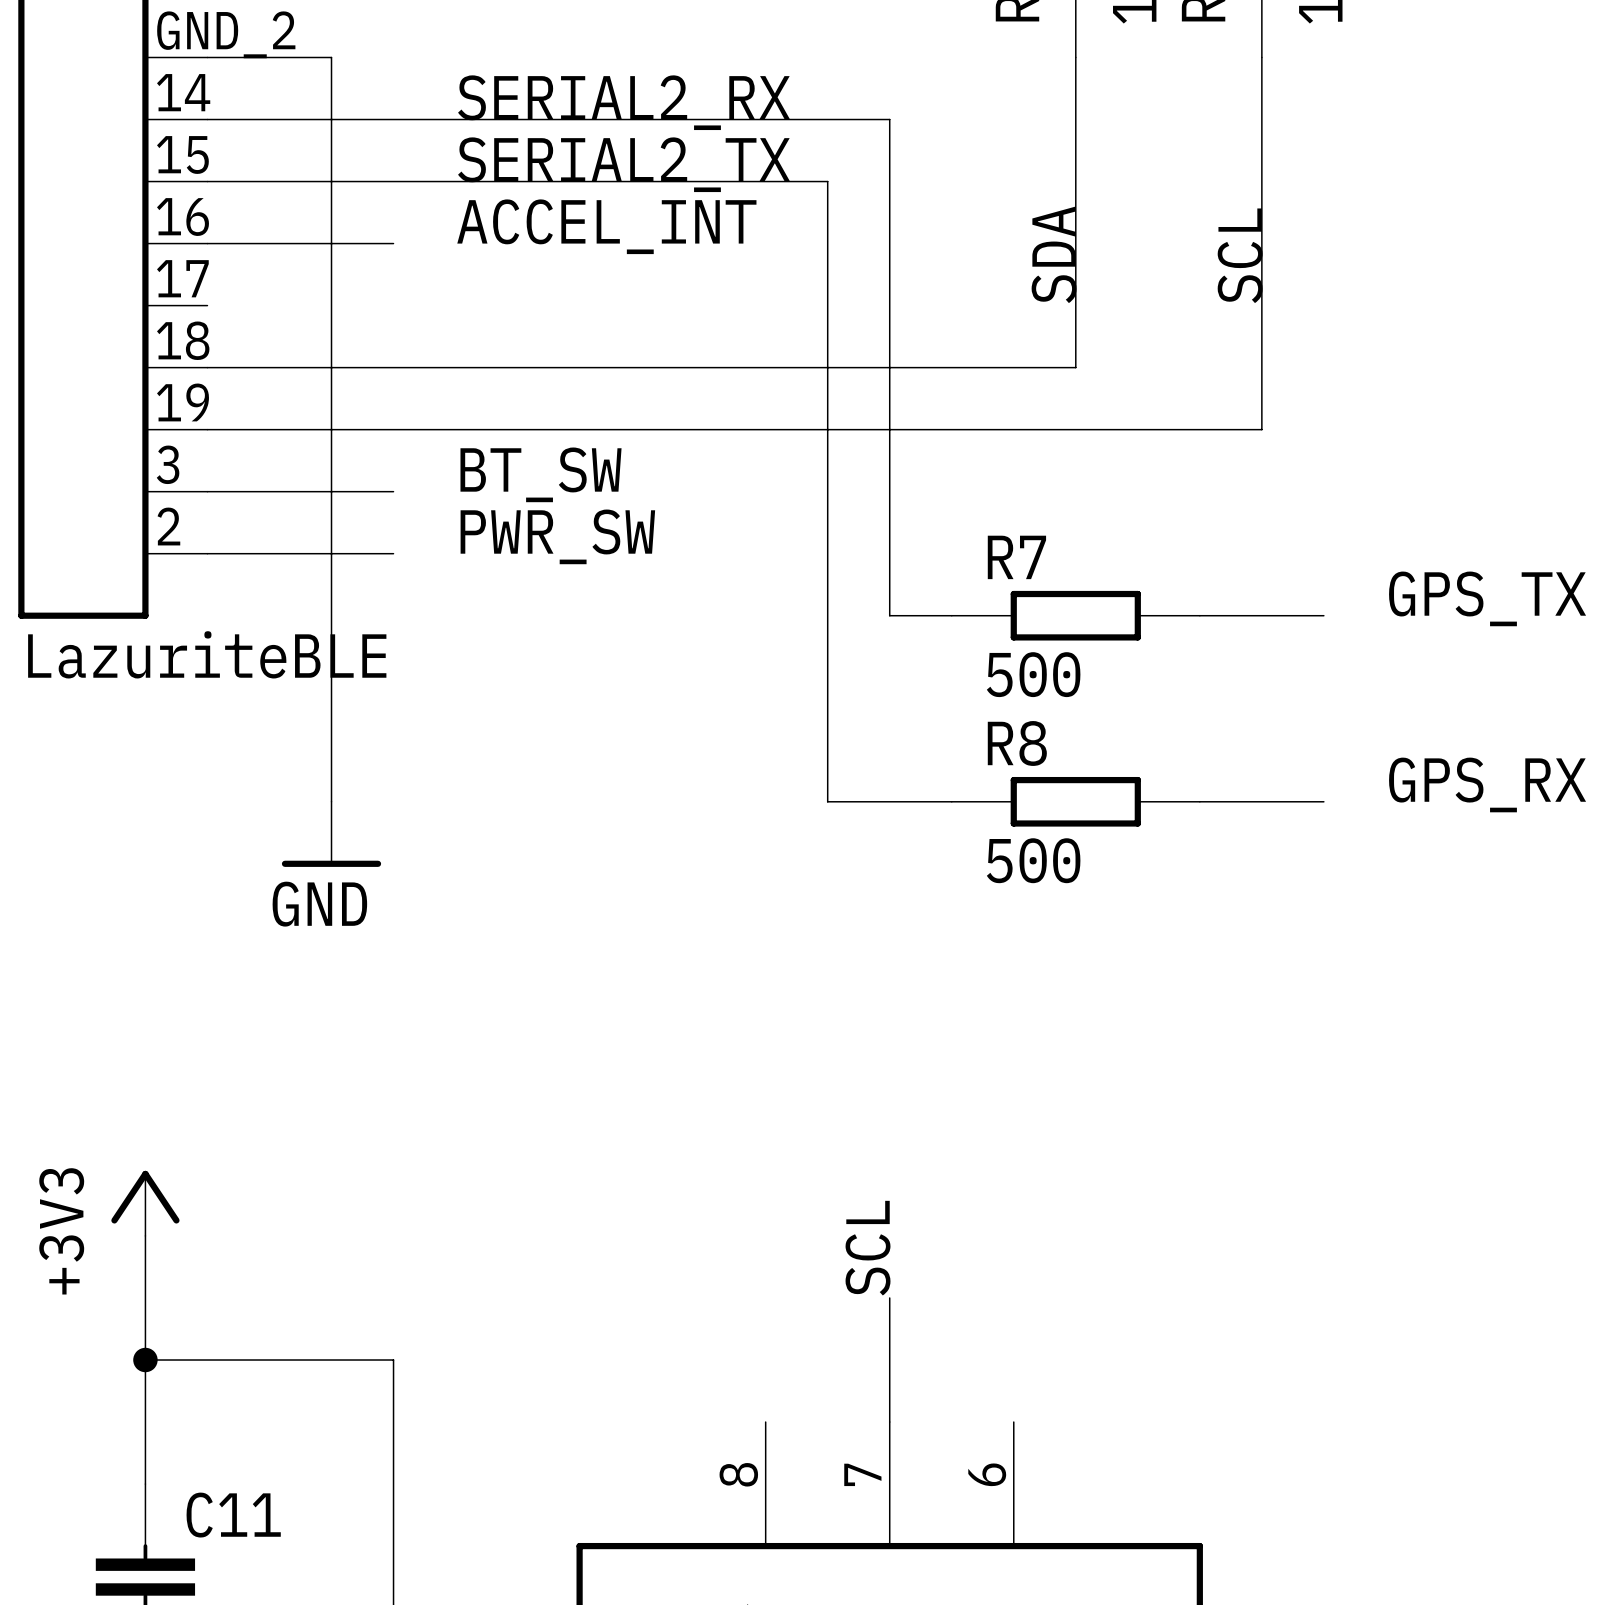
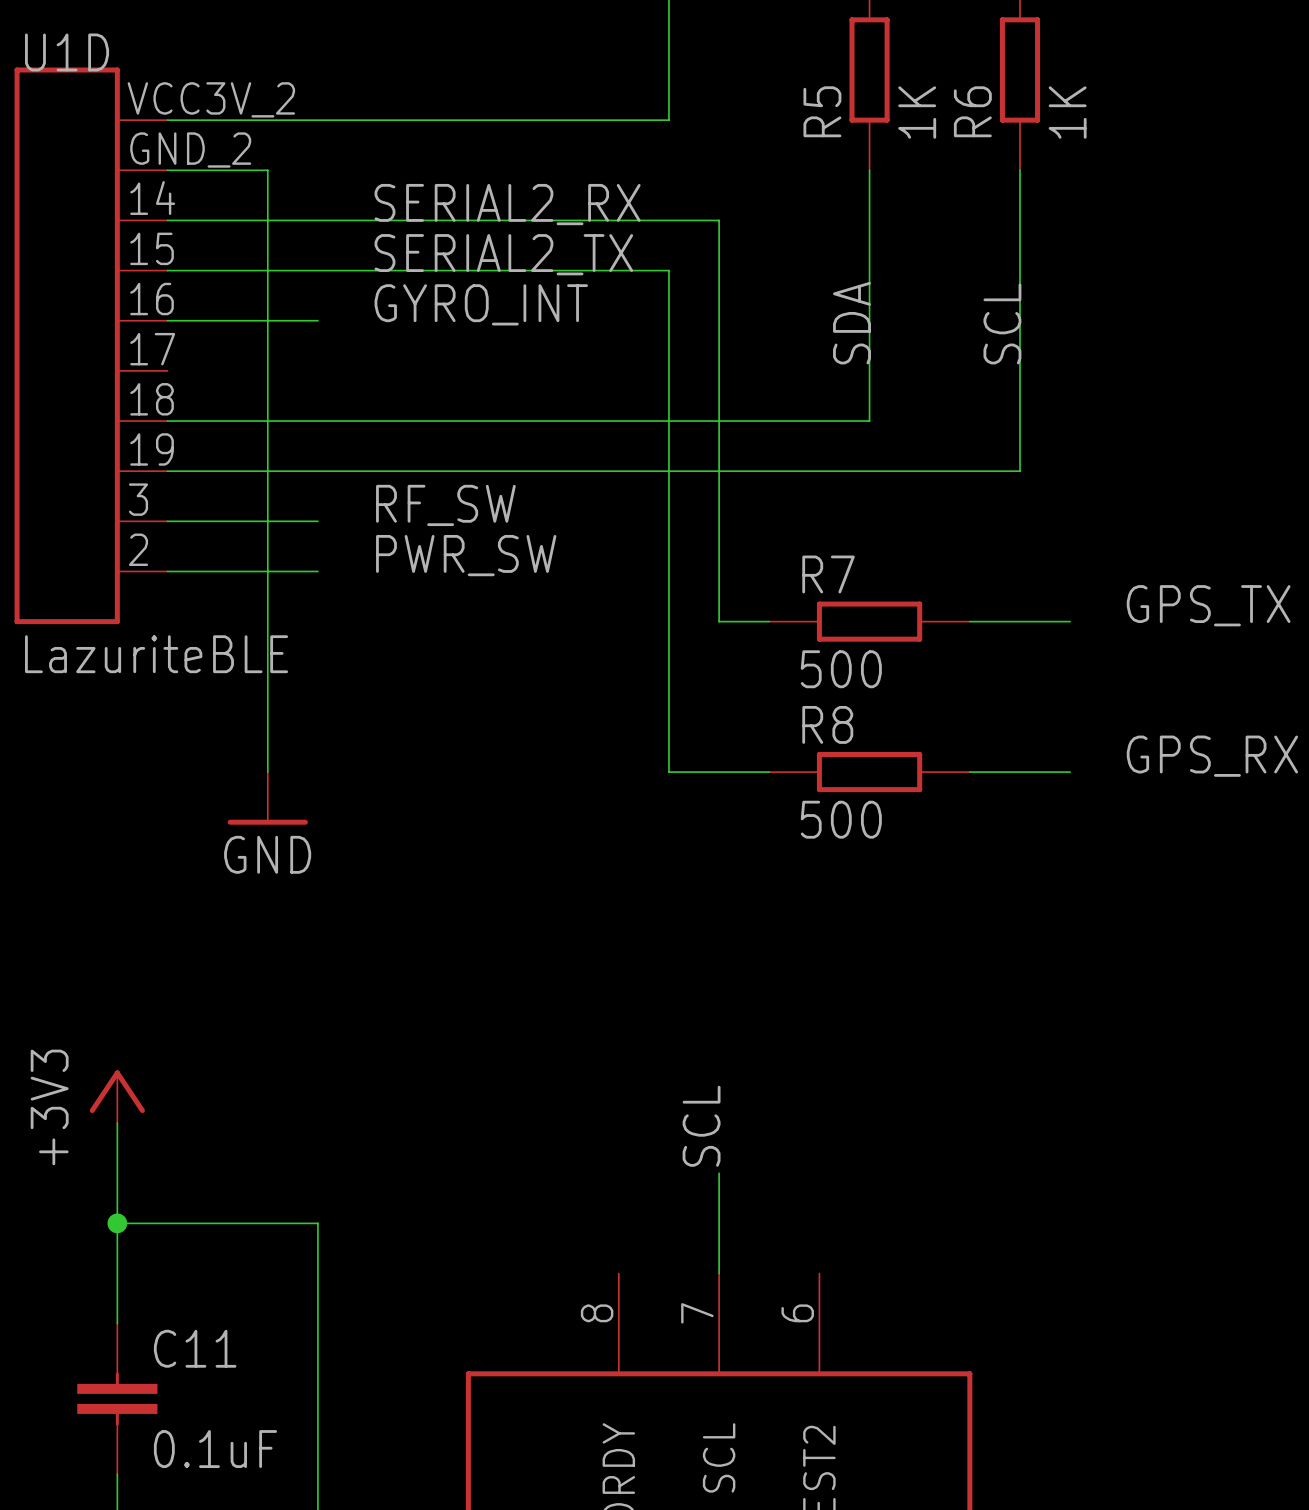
label: ACCEL_INT (606, 226) -> GYRO_INT (481, 304)
label: BT_SW (541, 474) -> RF_SW (445, 505)

